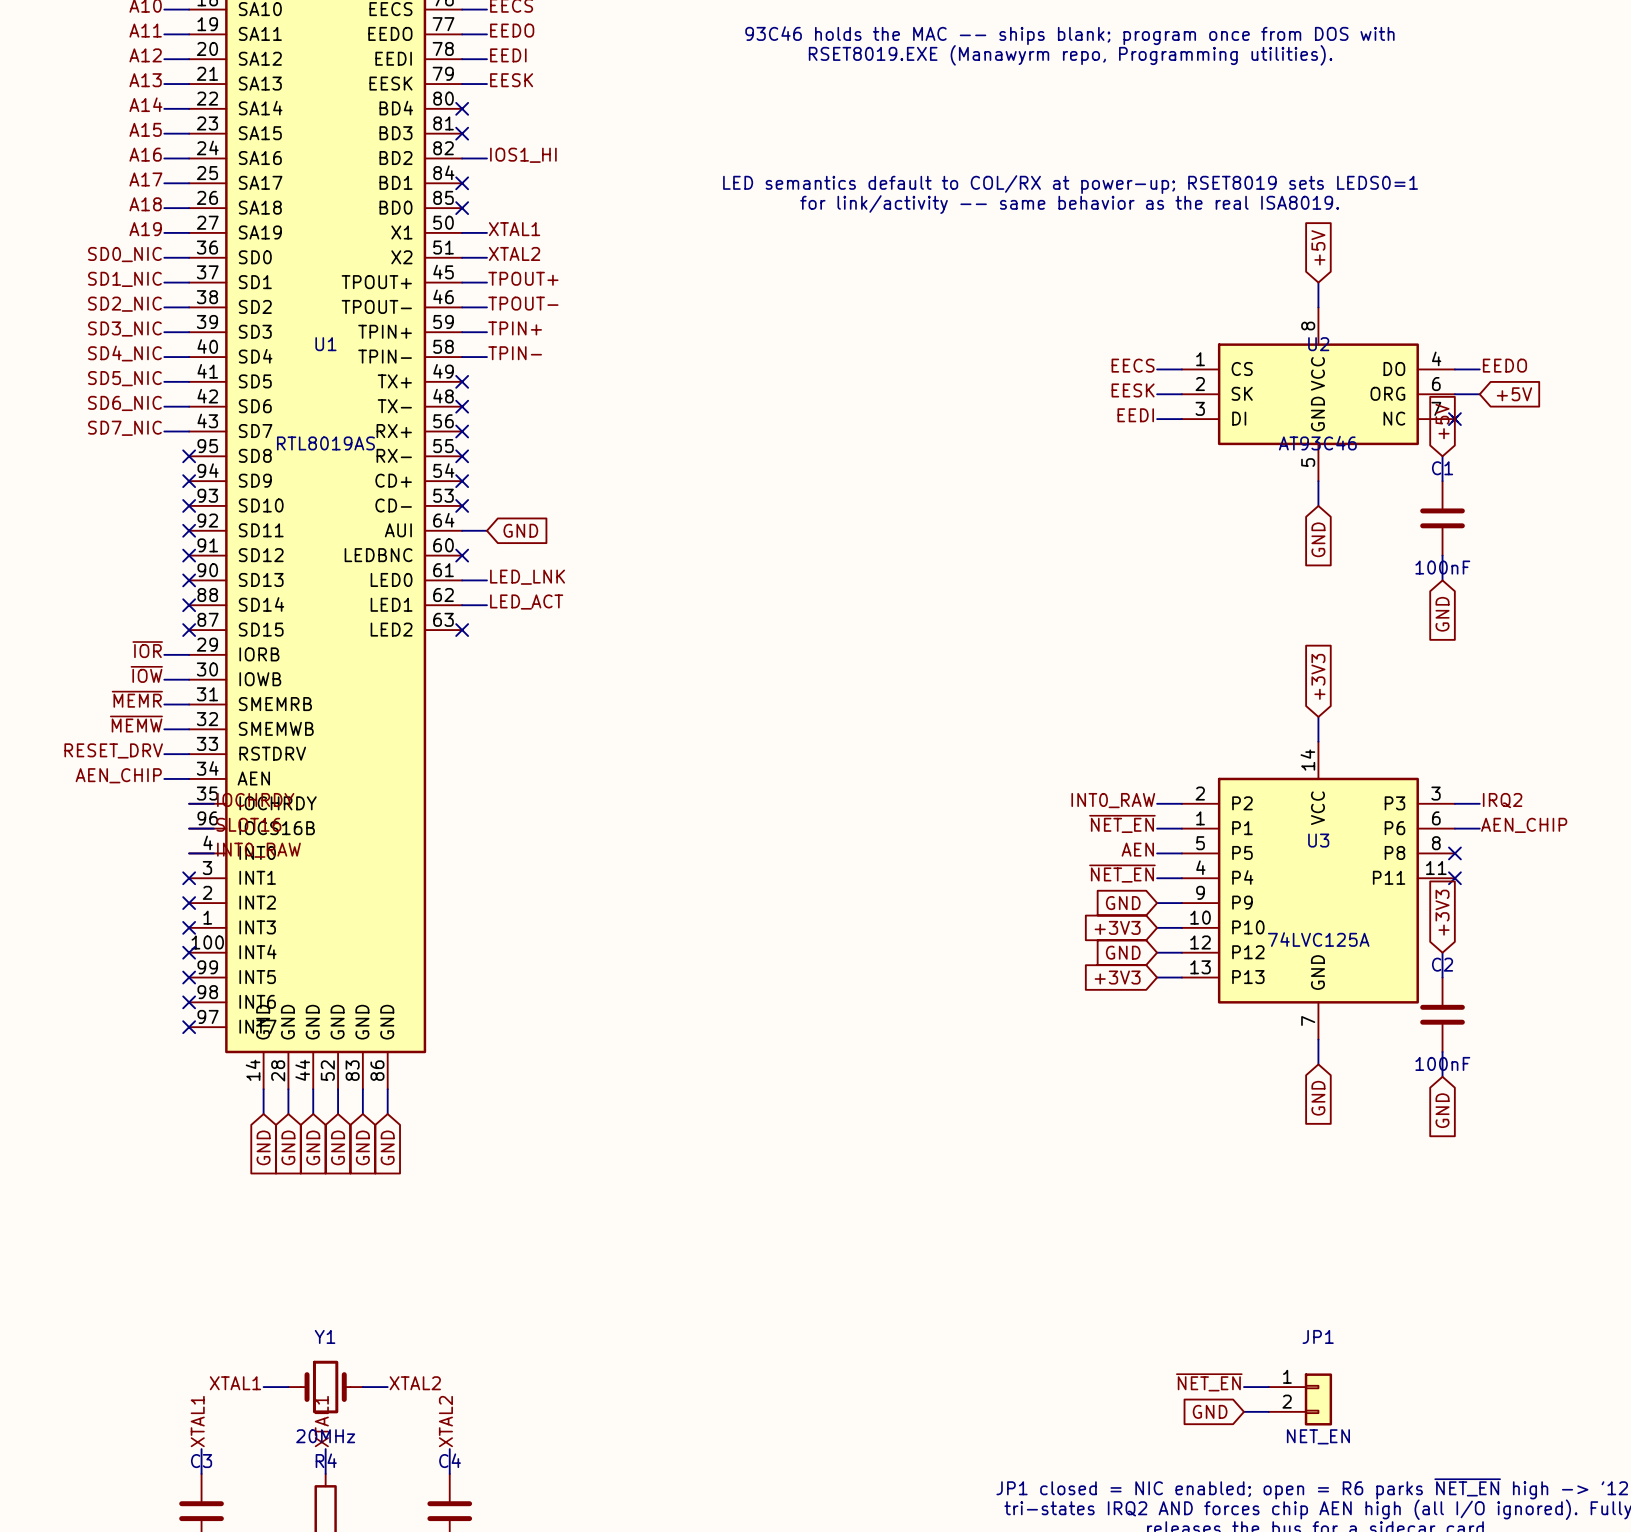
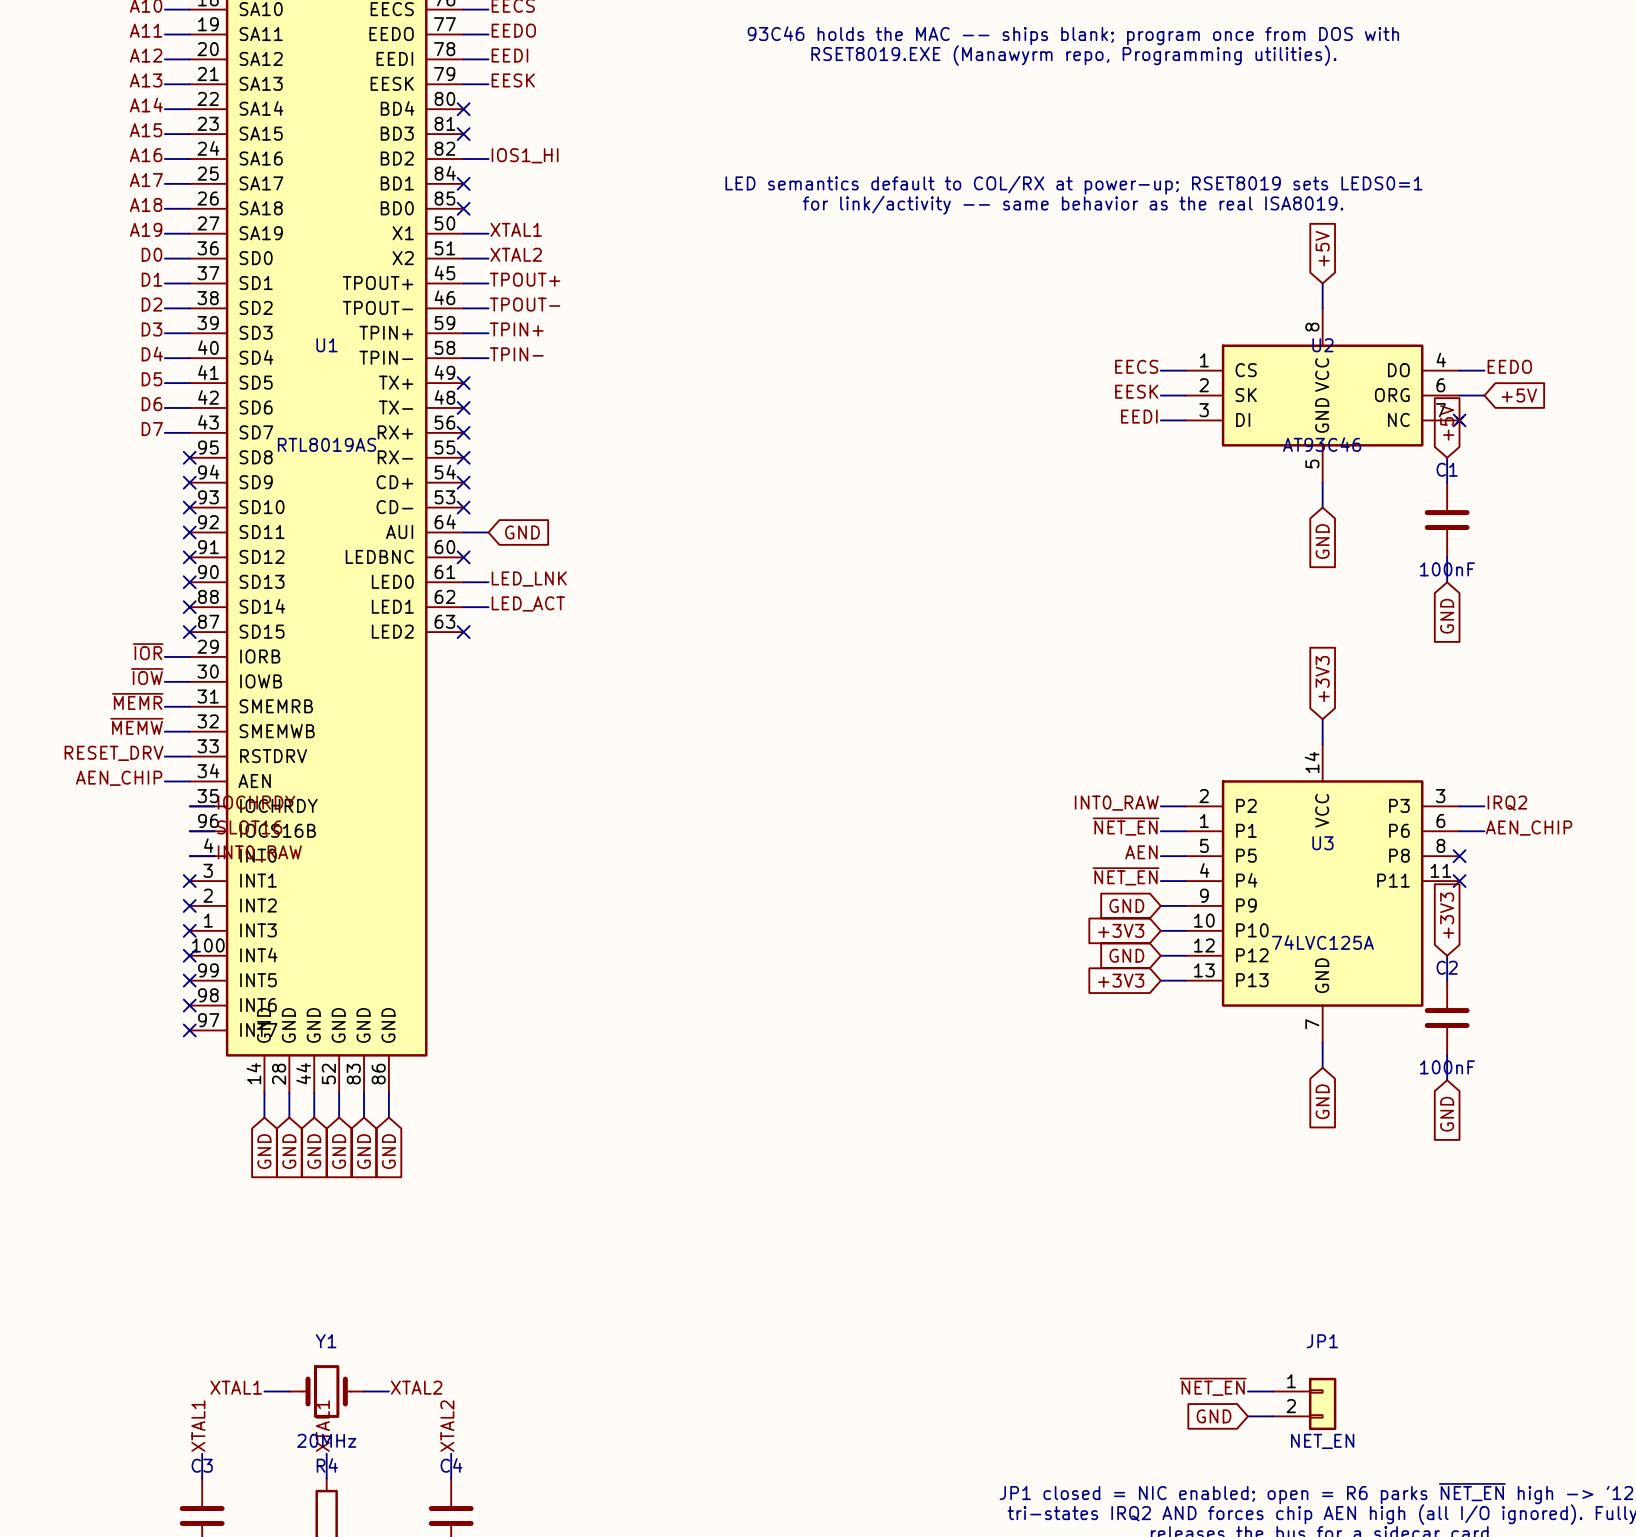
label: SD0_NIC (124, 254) -> D0 (152, 254)
label: SD1_NIC (124, 279) -> D1 (152, 279)
label: SD2_NIC (124, 304) -> D2 (152, 304)
label: SD3_NIC (124, 329) -> D3 (152, 329)
label: SD4_NIC (124, 353) -> D4 (152, 354)
label: SD5_NIC (124, 378) -> D5 (152, 379)
label: SD6_NIC (124, 403) -> D6 (152, 404)
label: SD7_NIC (124, 428) -> D7 (152, 429)

